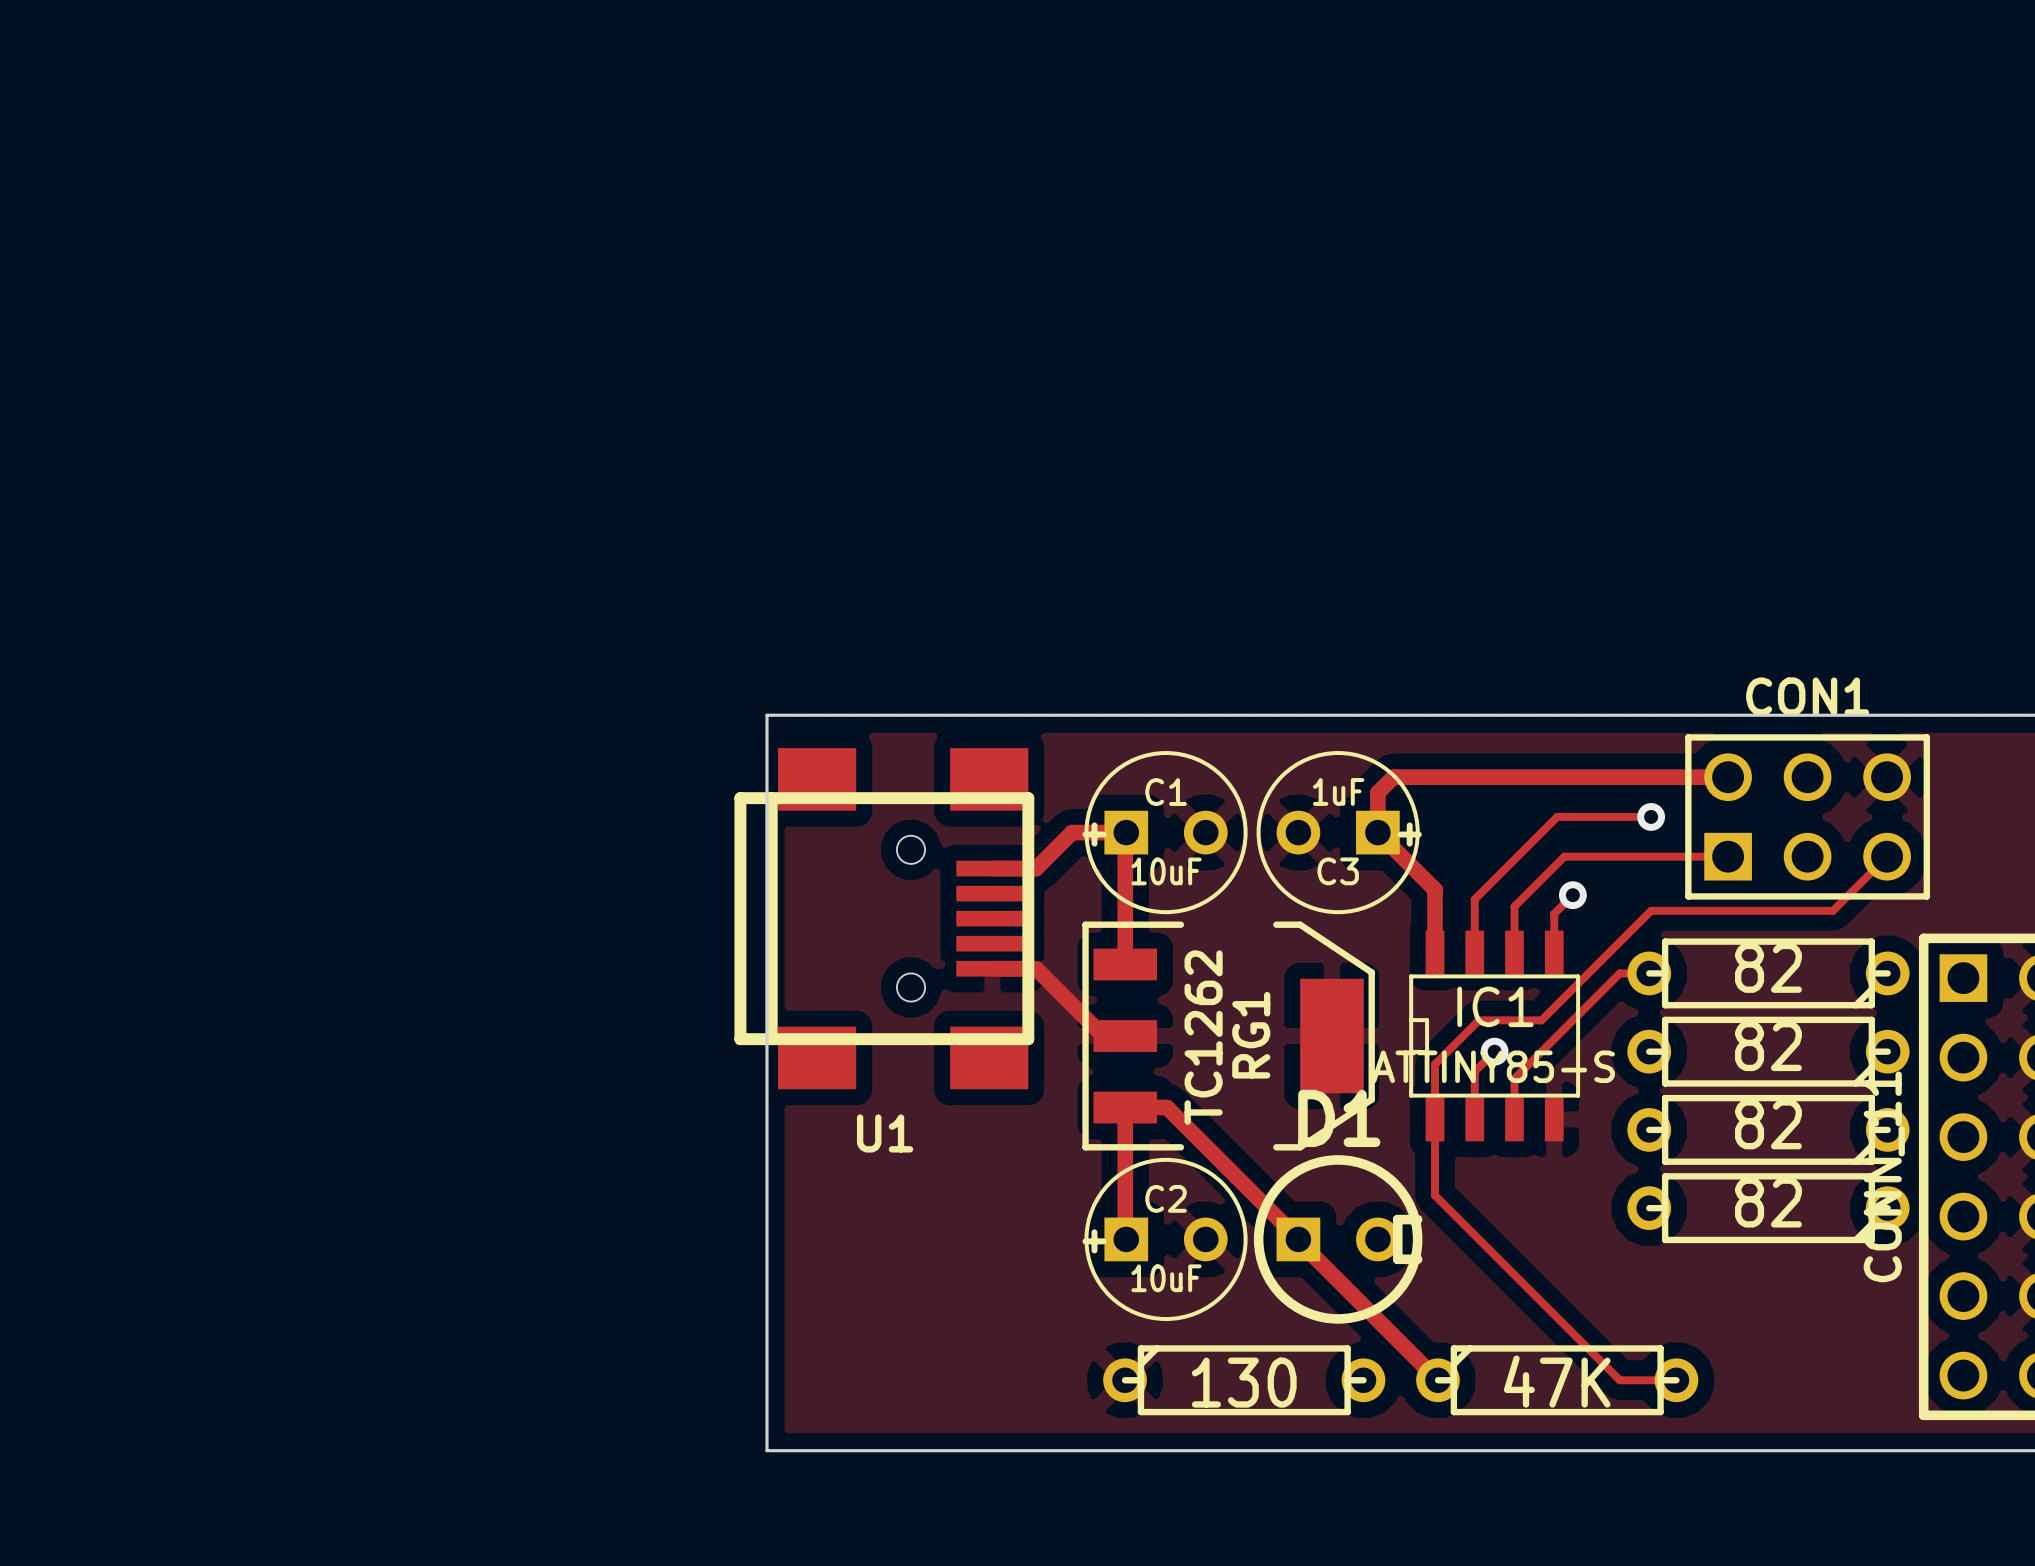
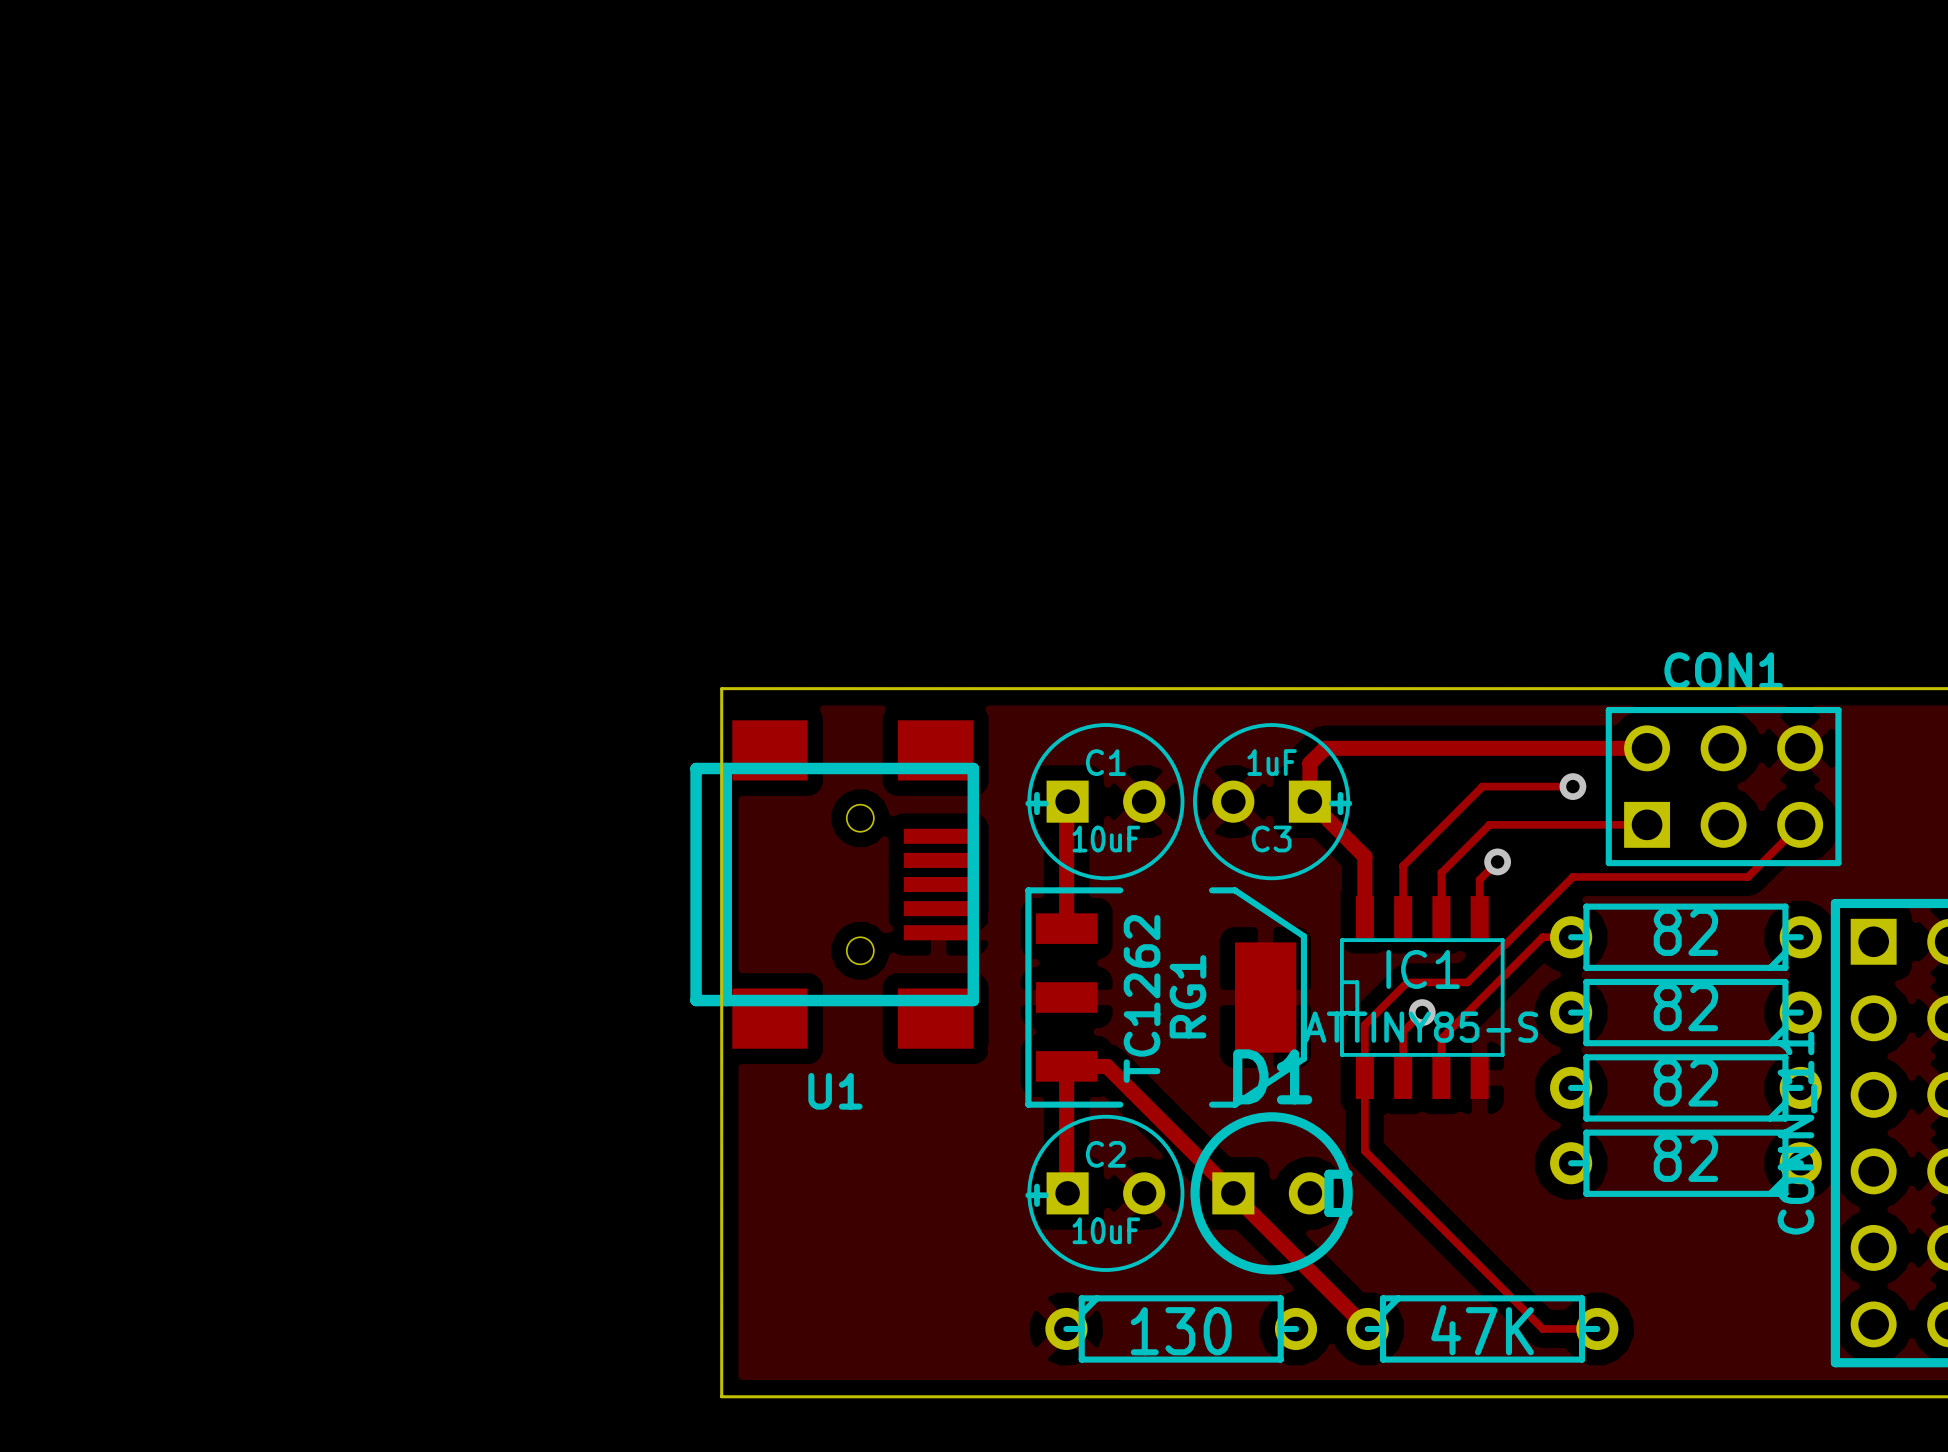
track: (1126, 832) (1072, 832) (1036, 868) (992, 868) -> none
track: (992, 968) (1036, 968) (1103, 1036) (1125, 1036) -> none

